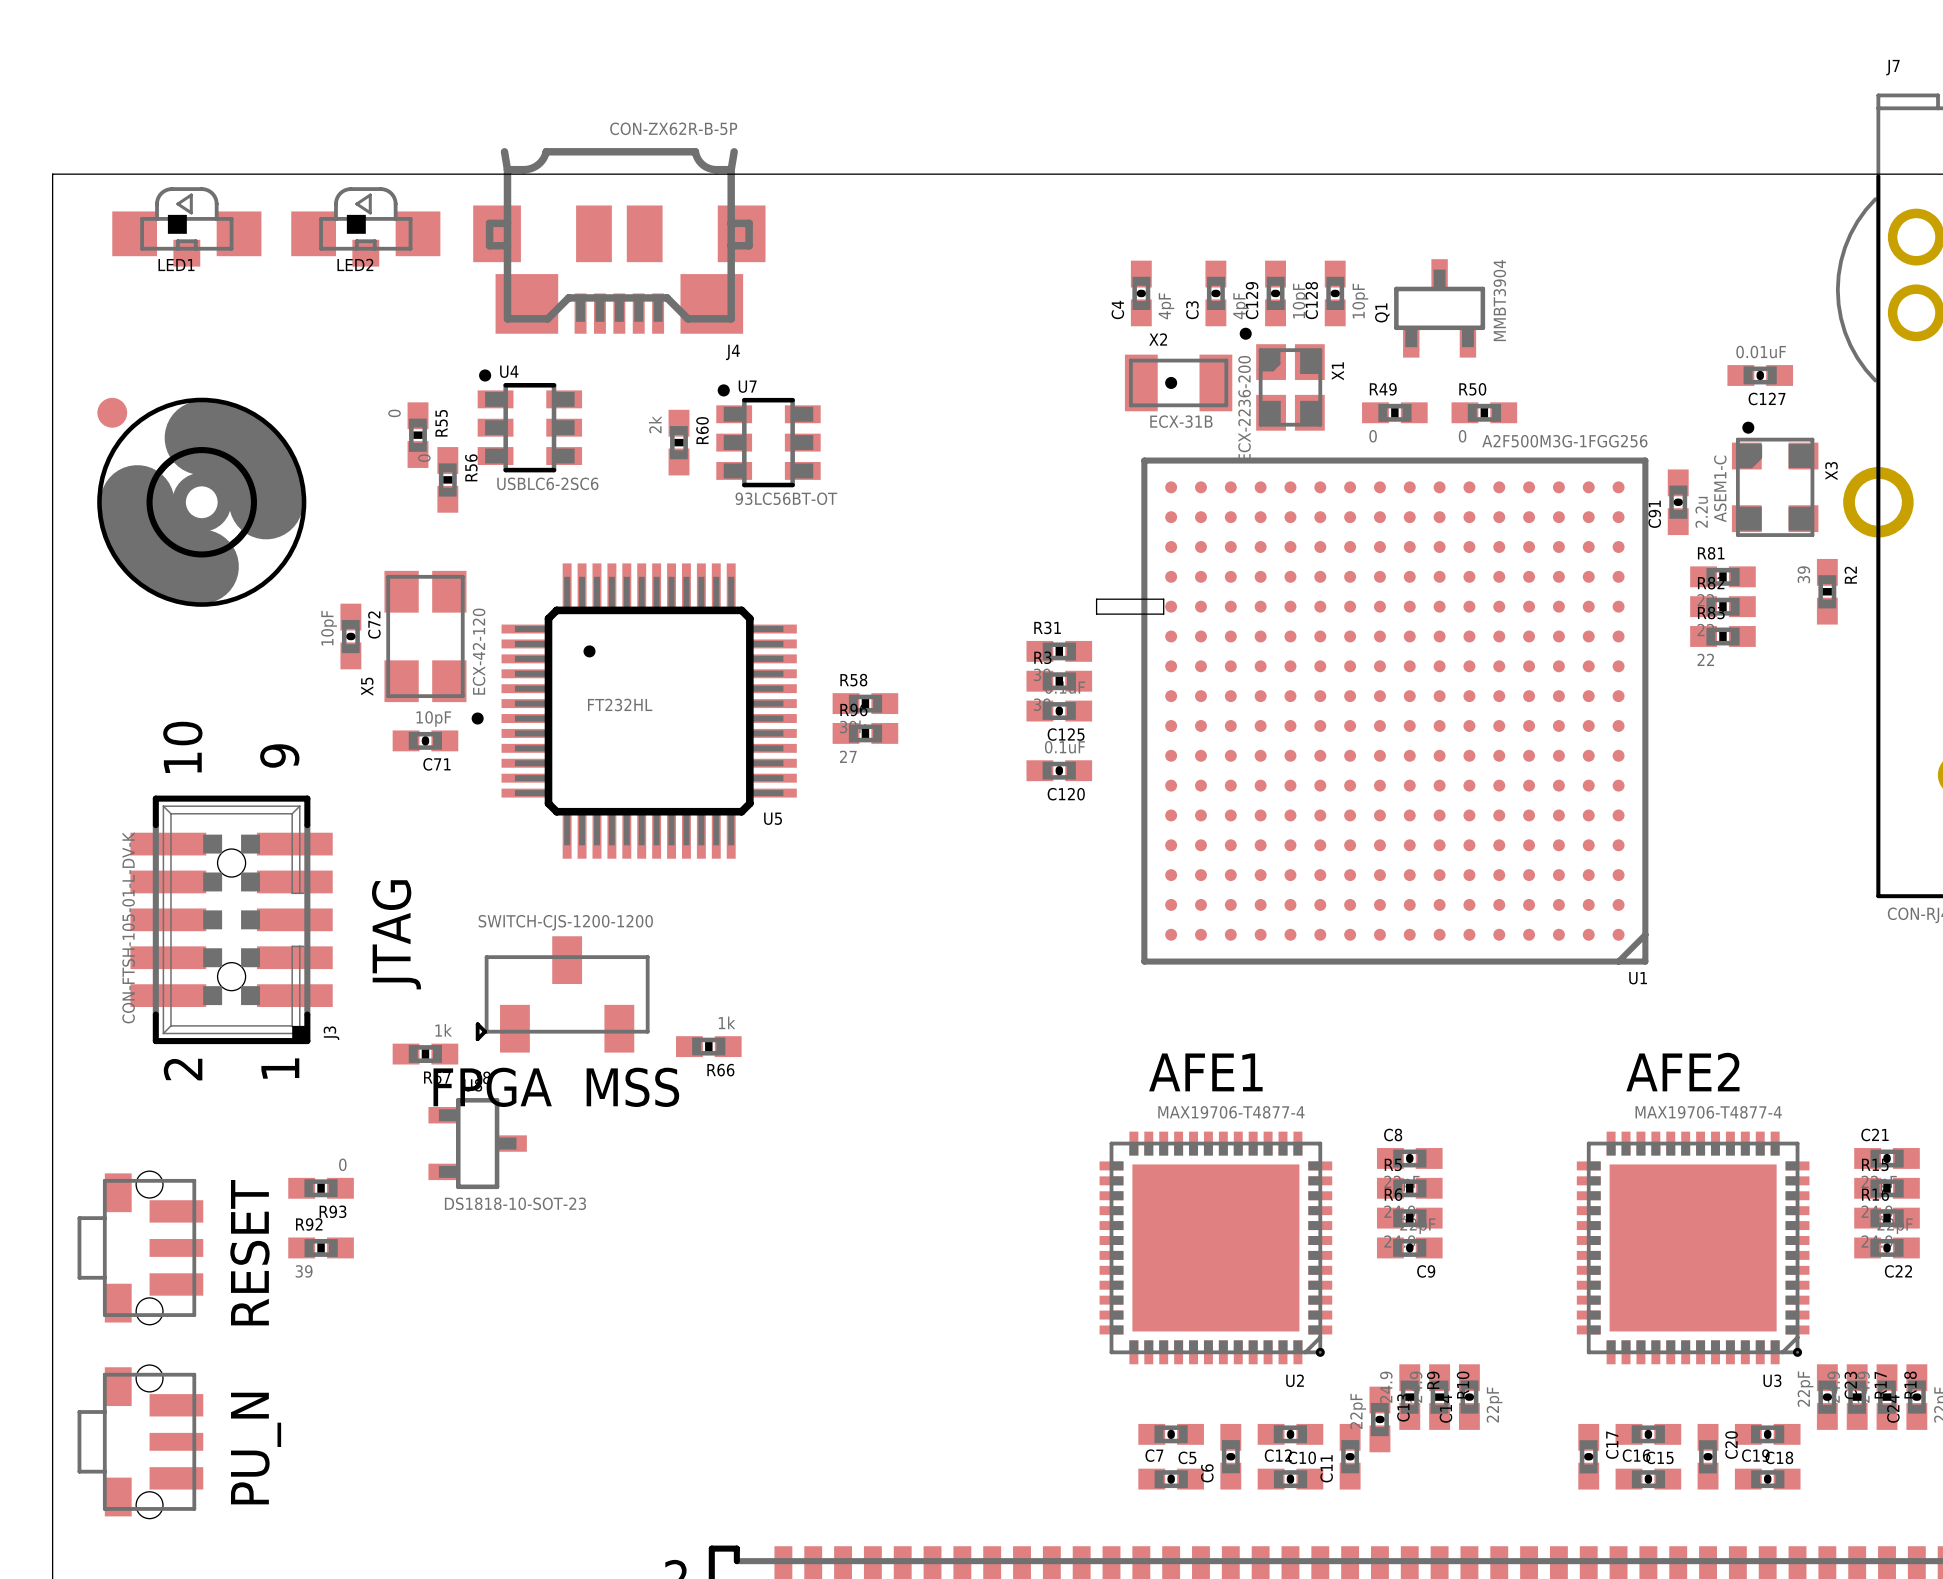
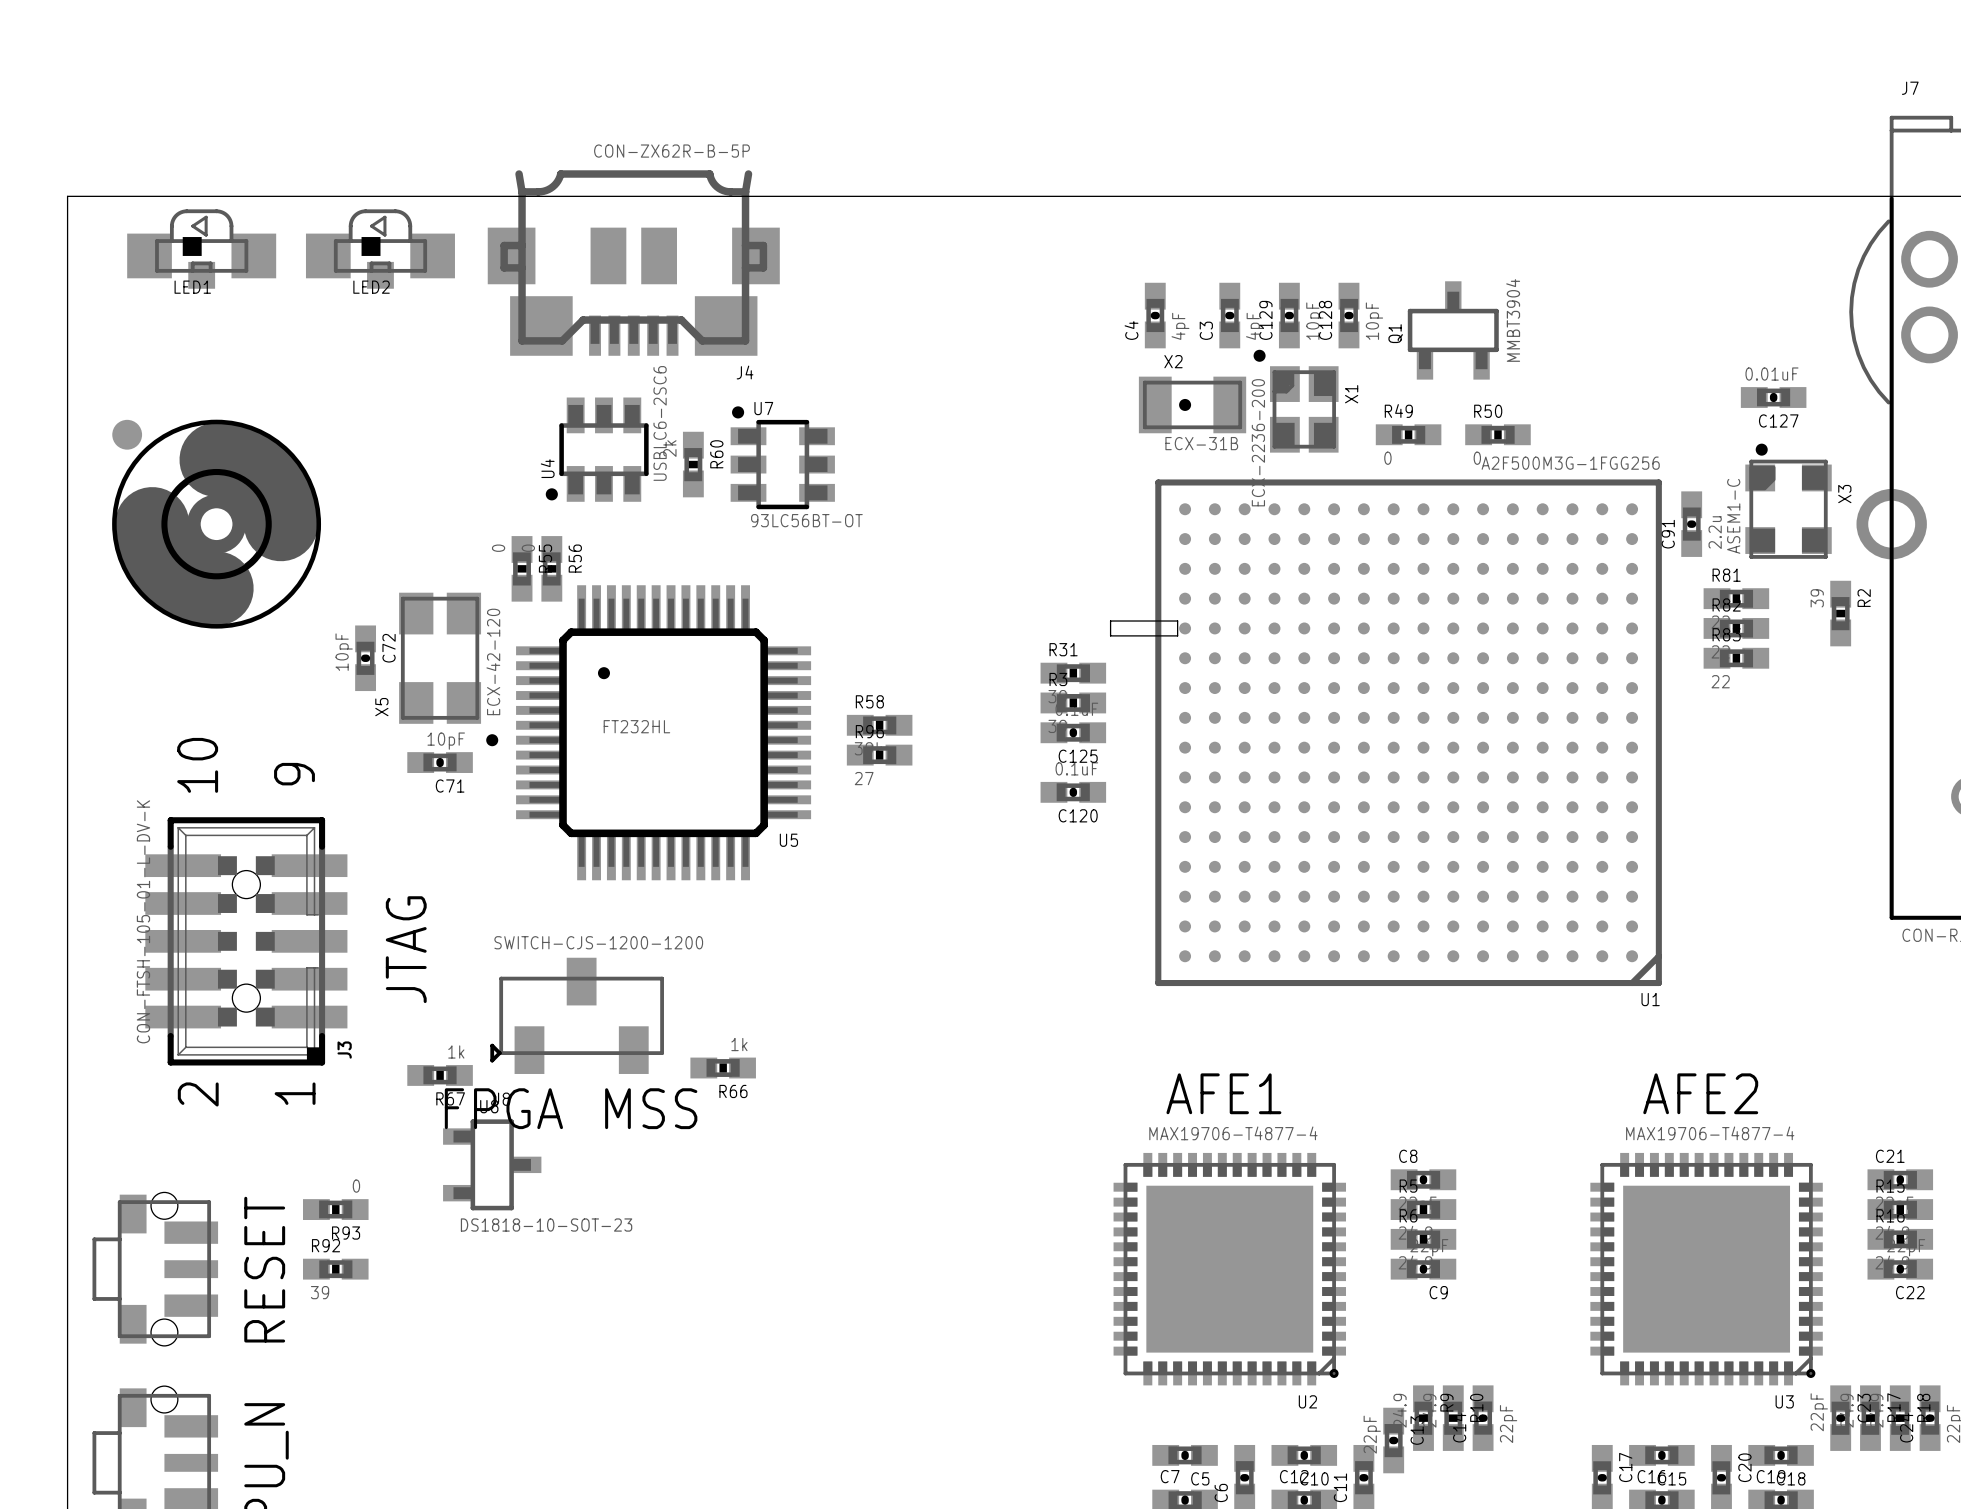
U4 rotation: 0° (529, 420) -> 90° counterclockwise (597, 449)
R55 position: (418, 435) -> (522, 568)
R56 position: (447, 479) -> (551, 568)

